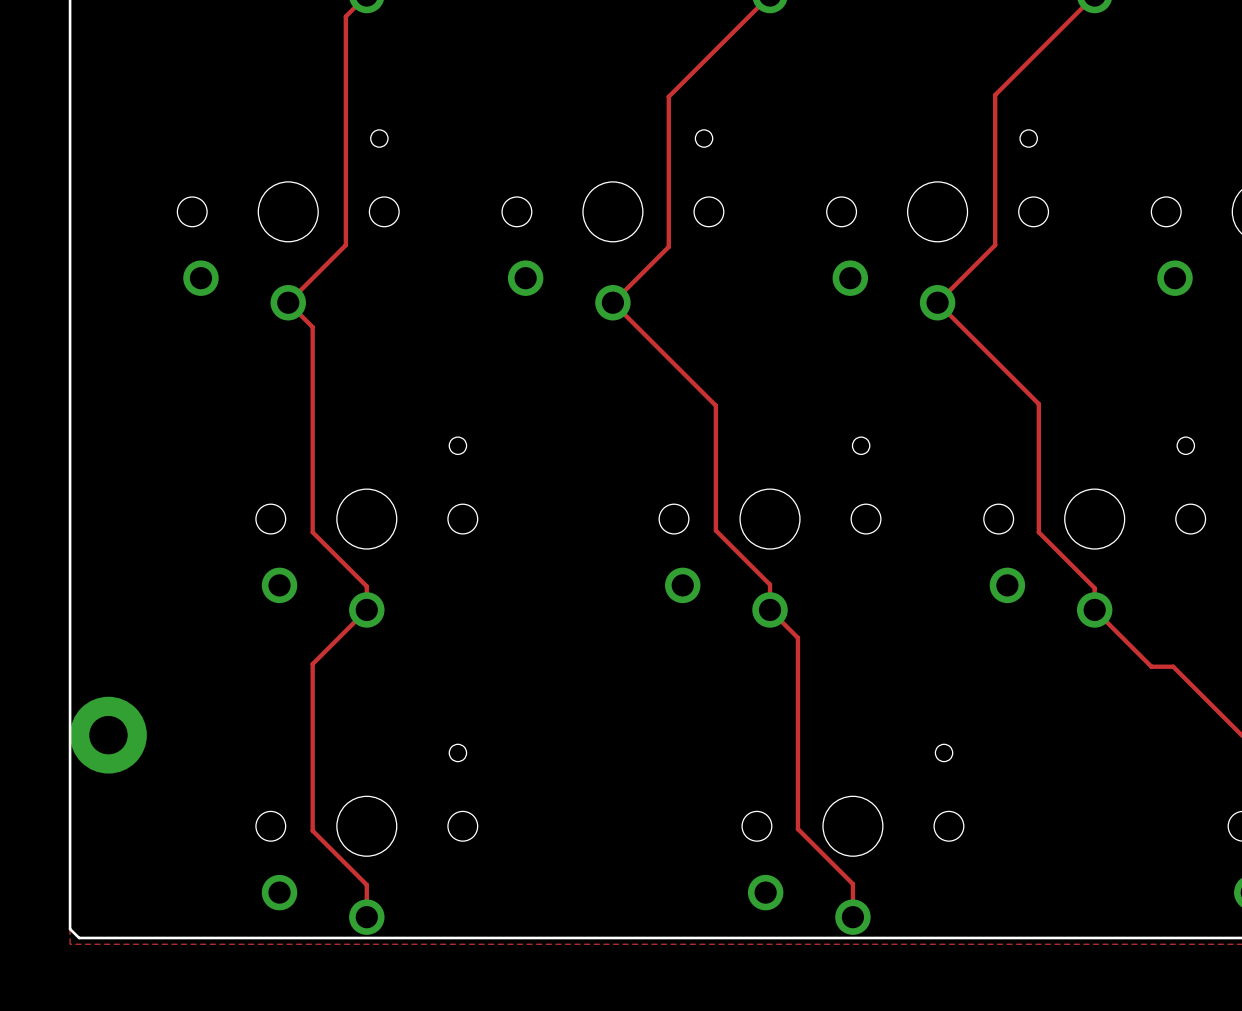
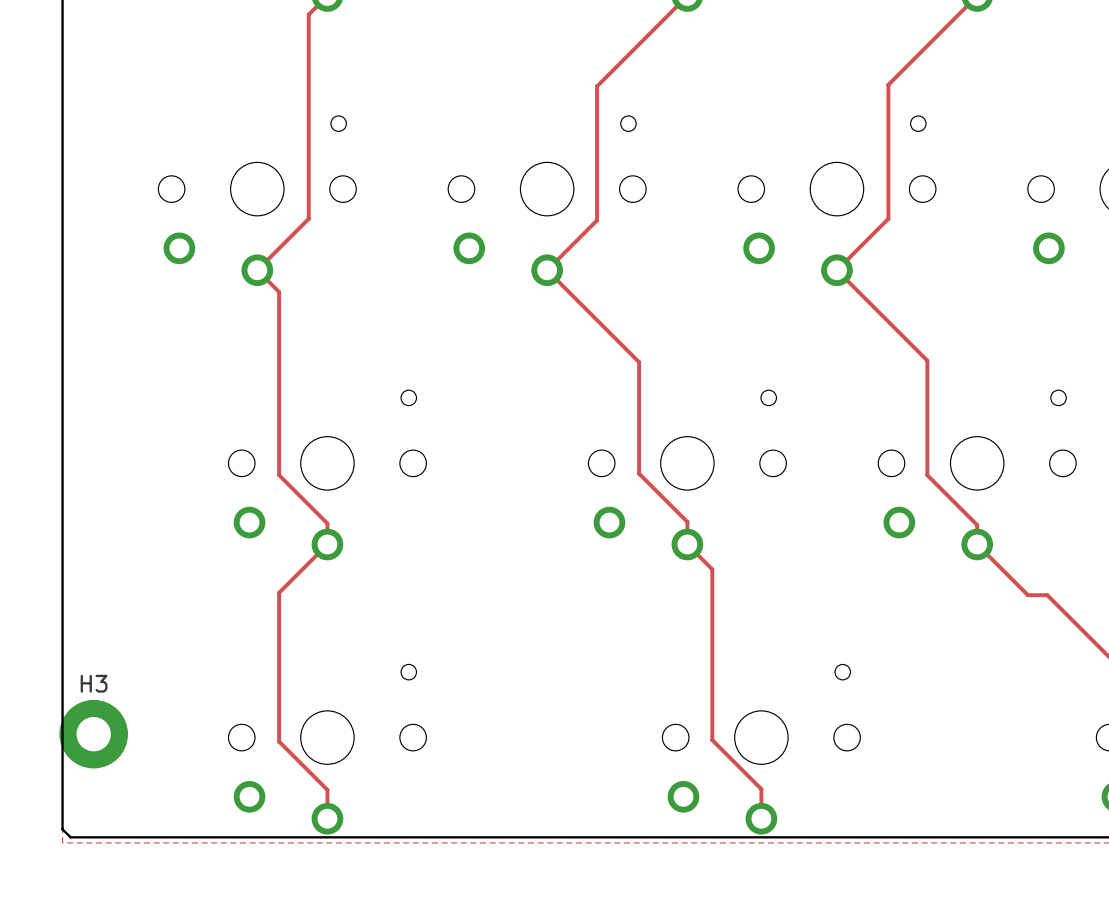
part: (108, 735) -> none
H3: none -> (93, 734)

